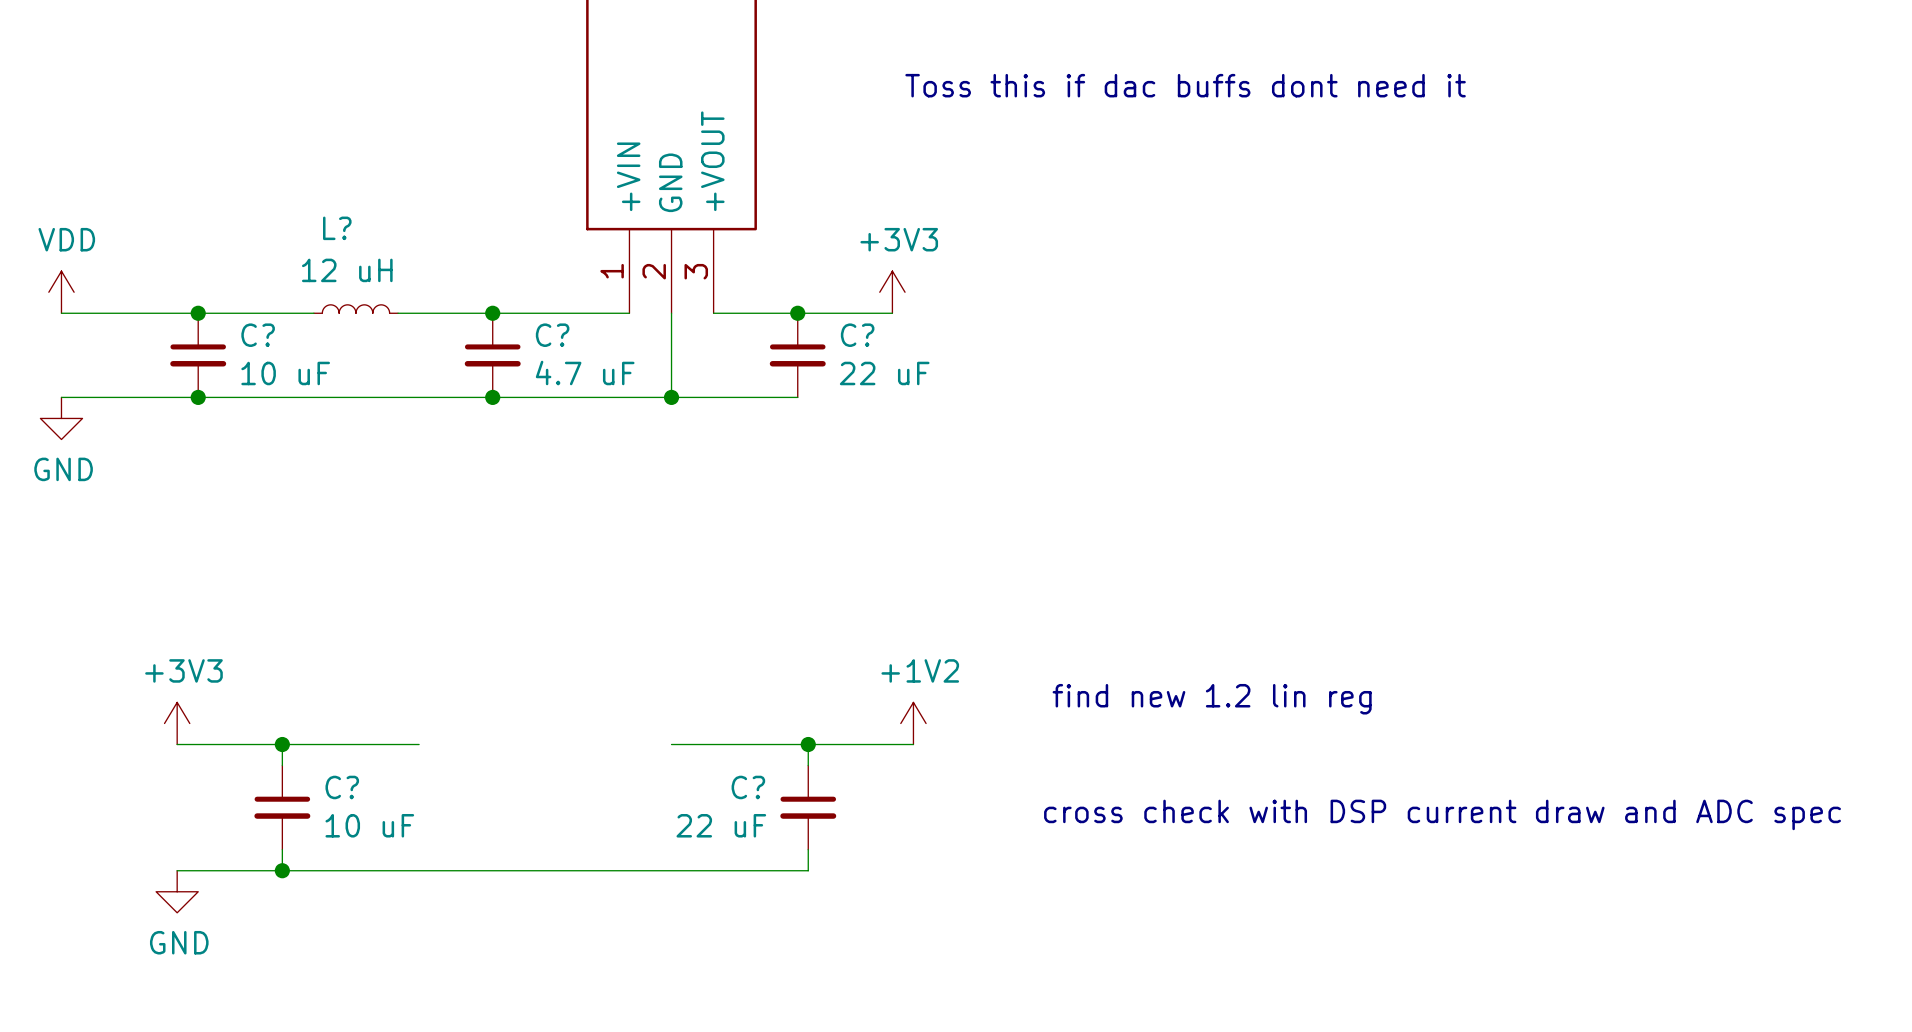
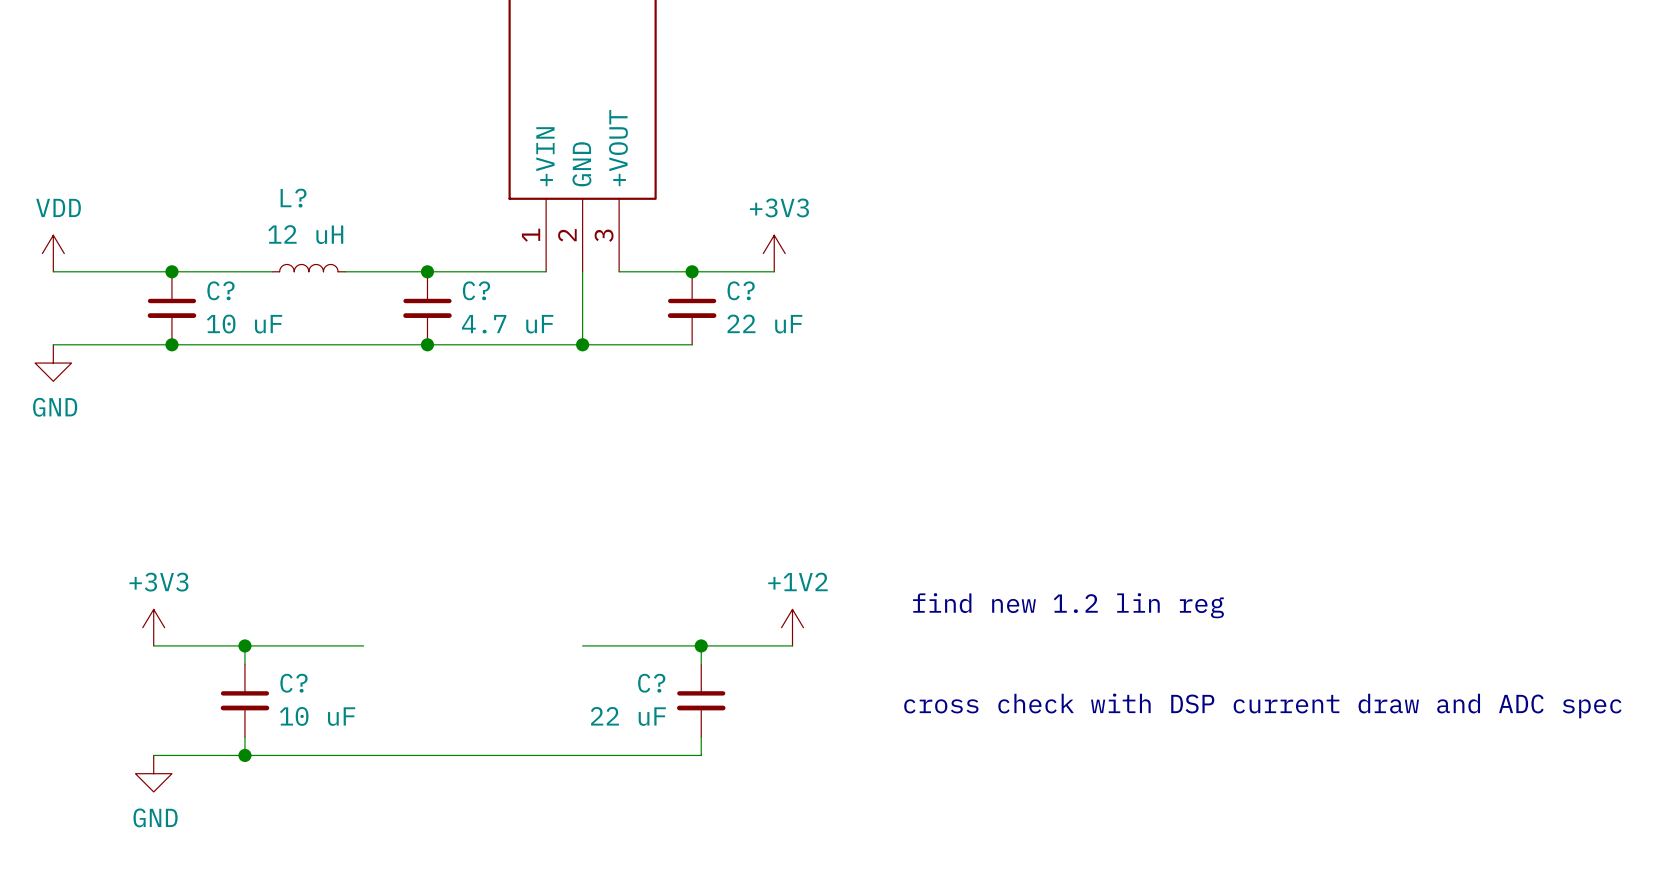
text: Toss this if dac buffs dont need it (1185, 85) -> none

